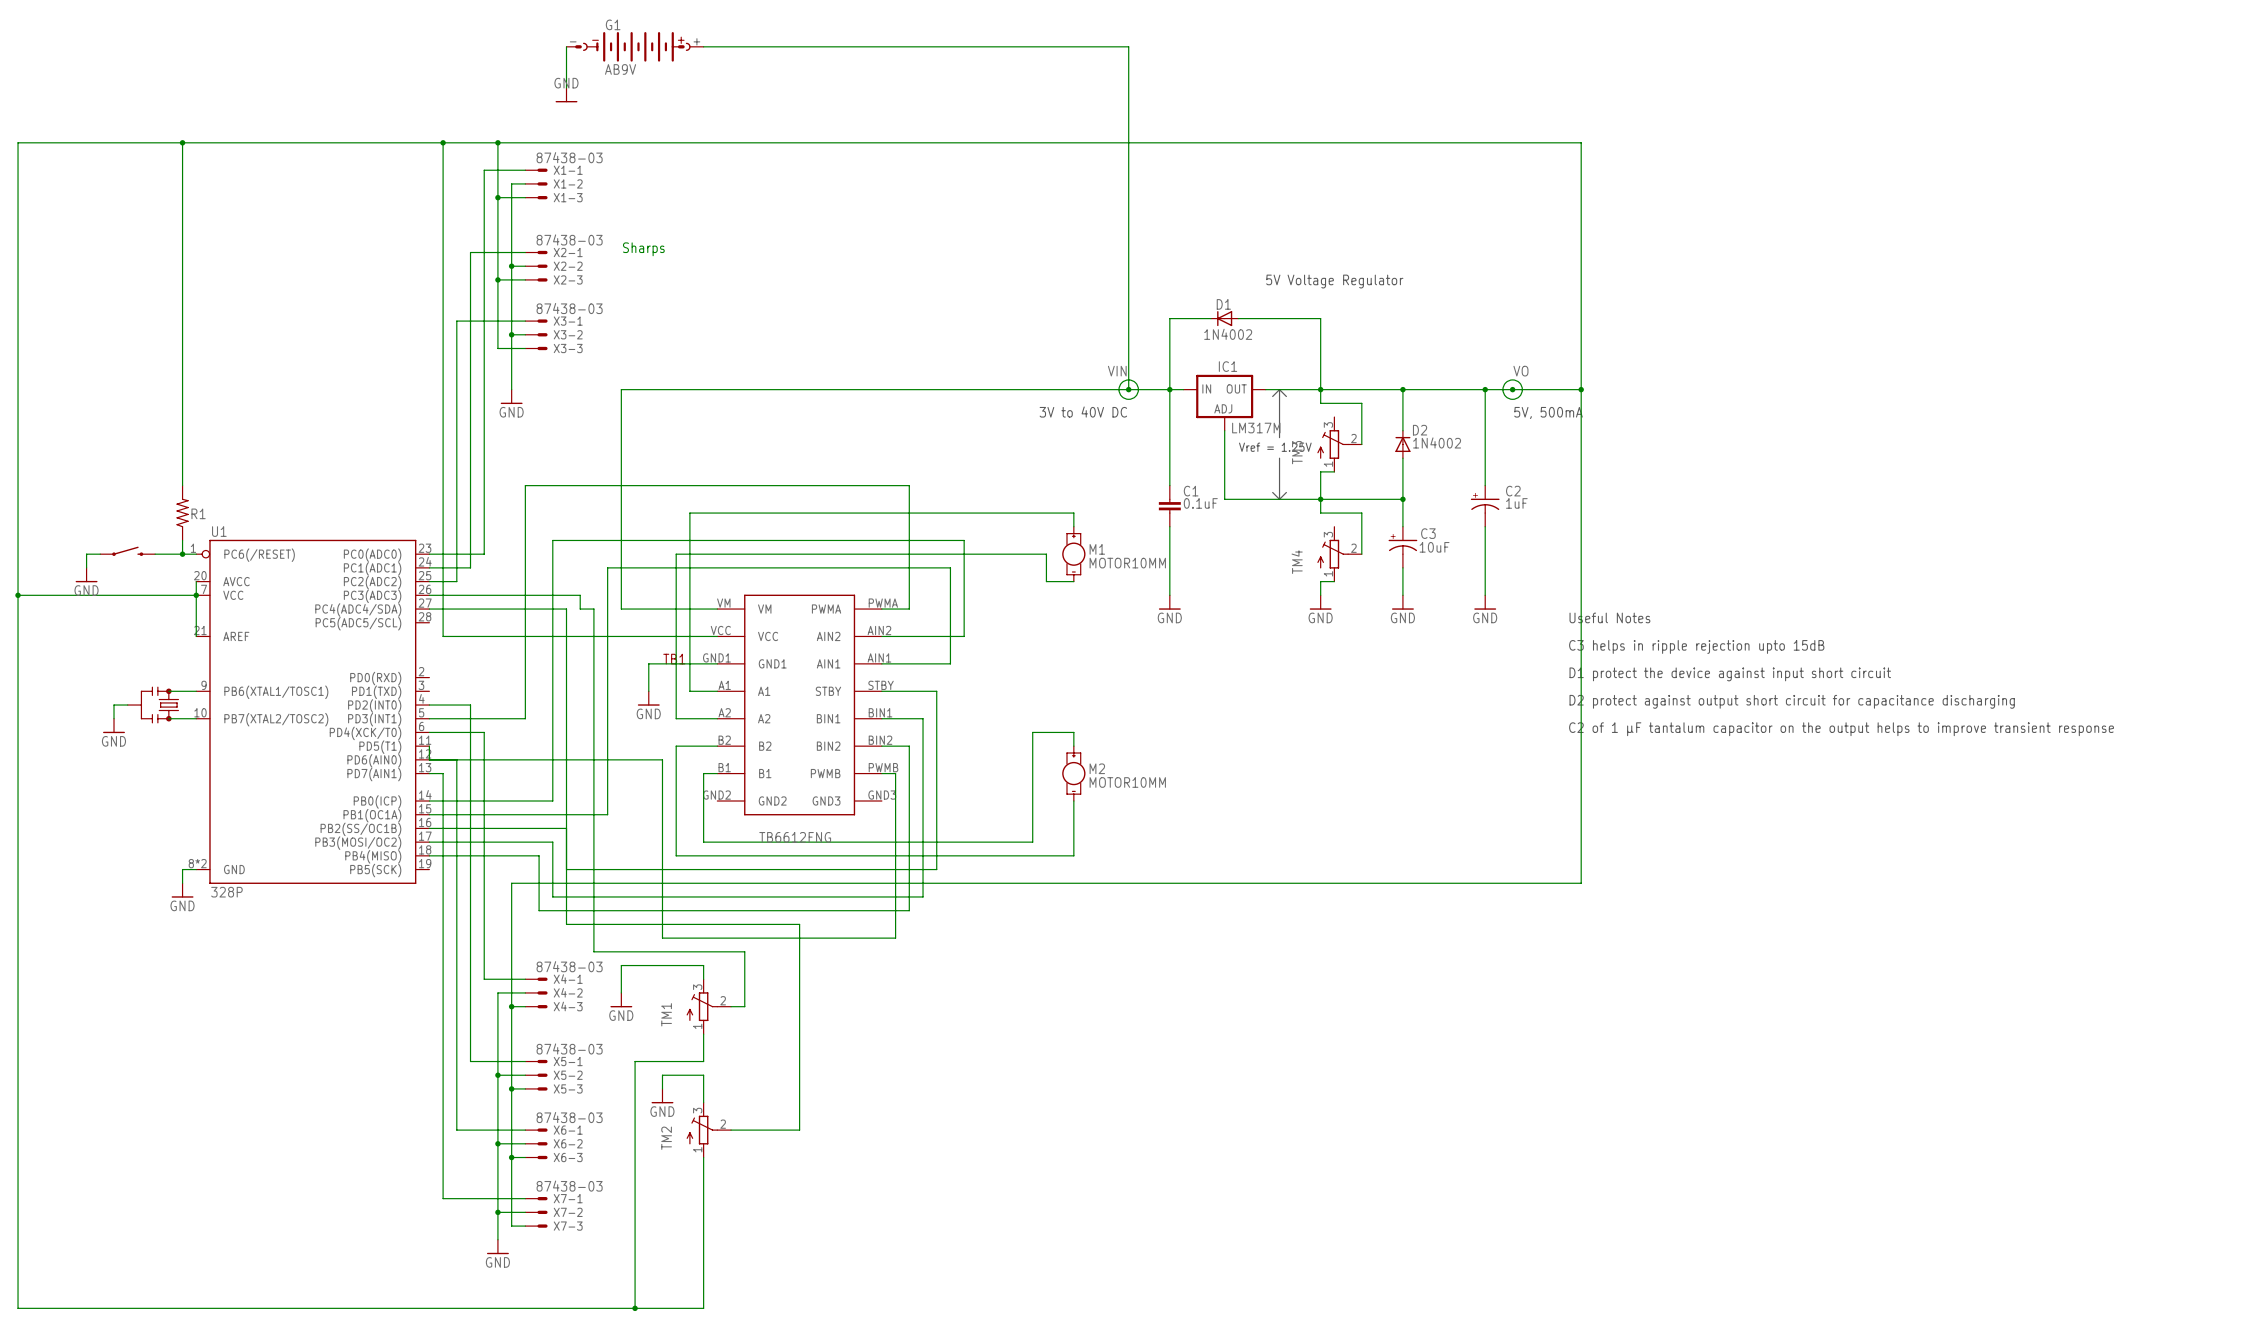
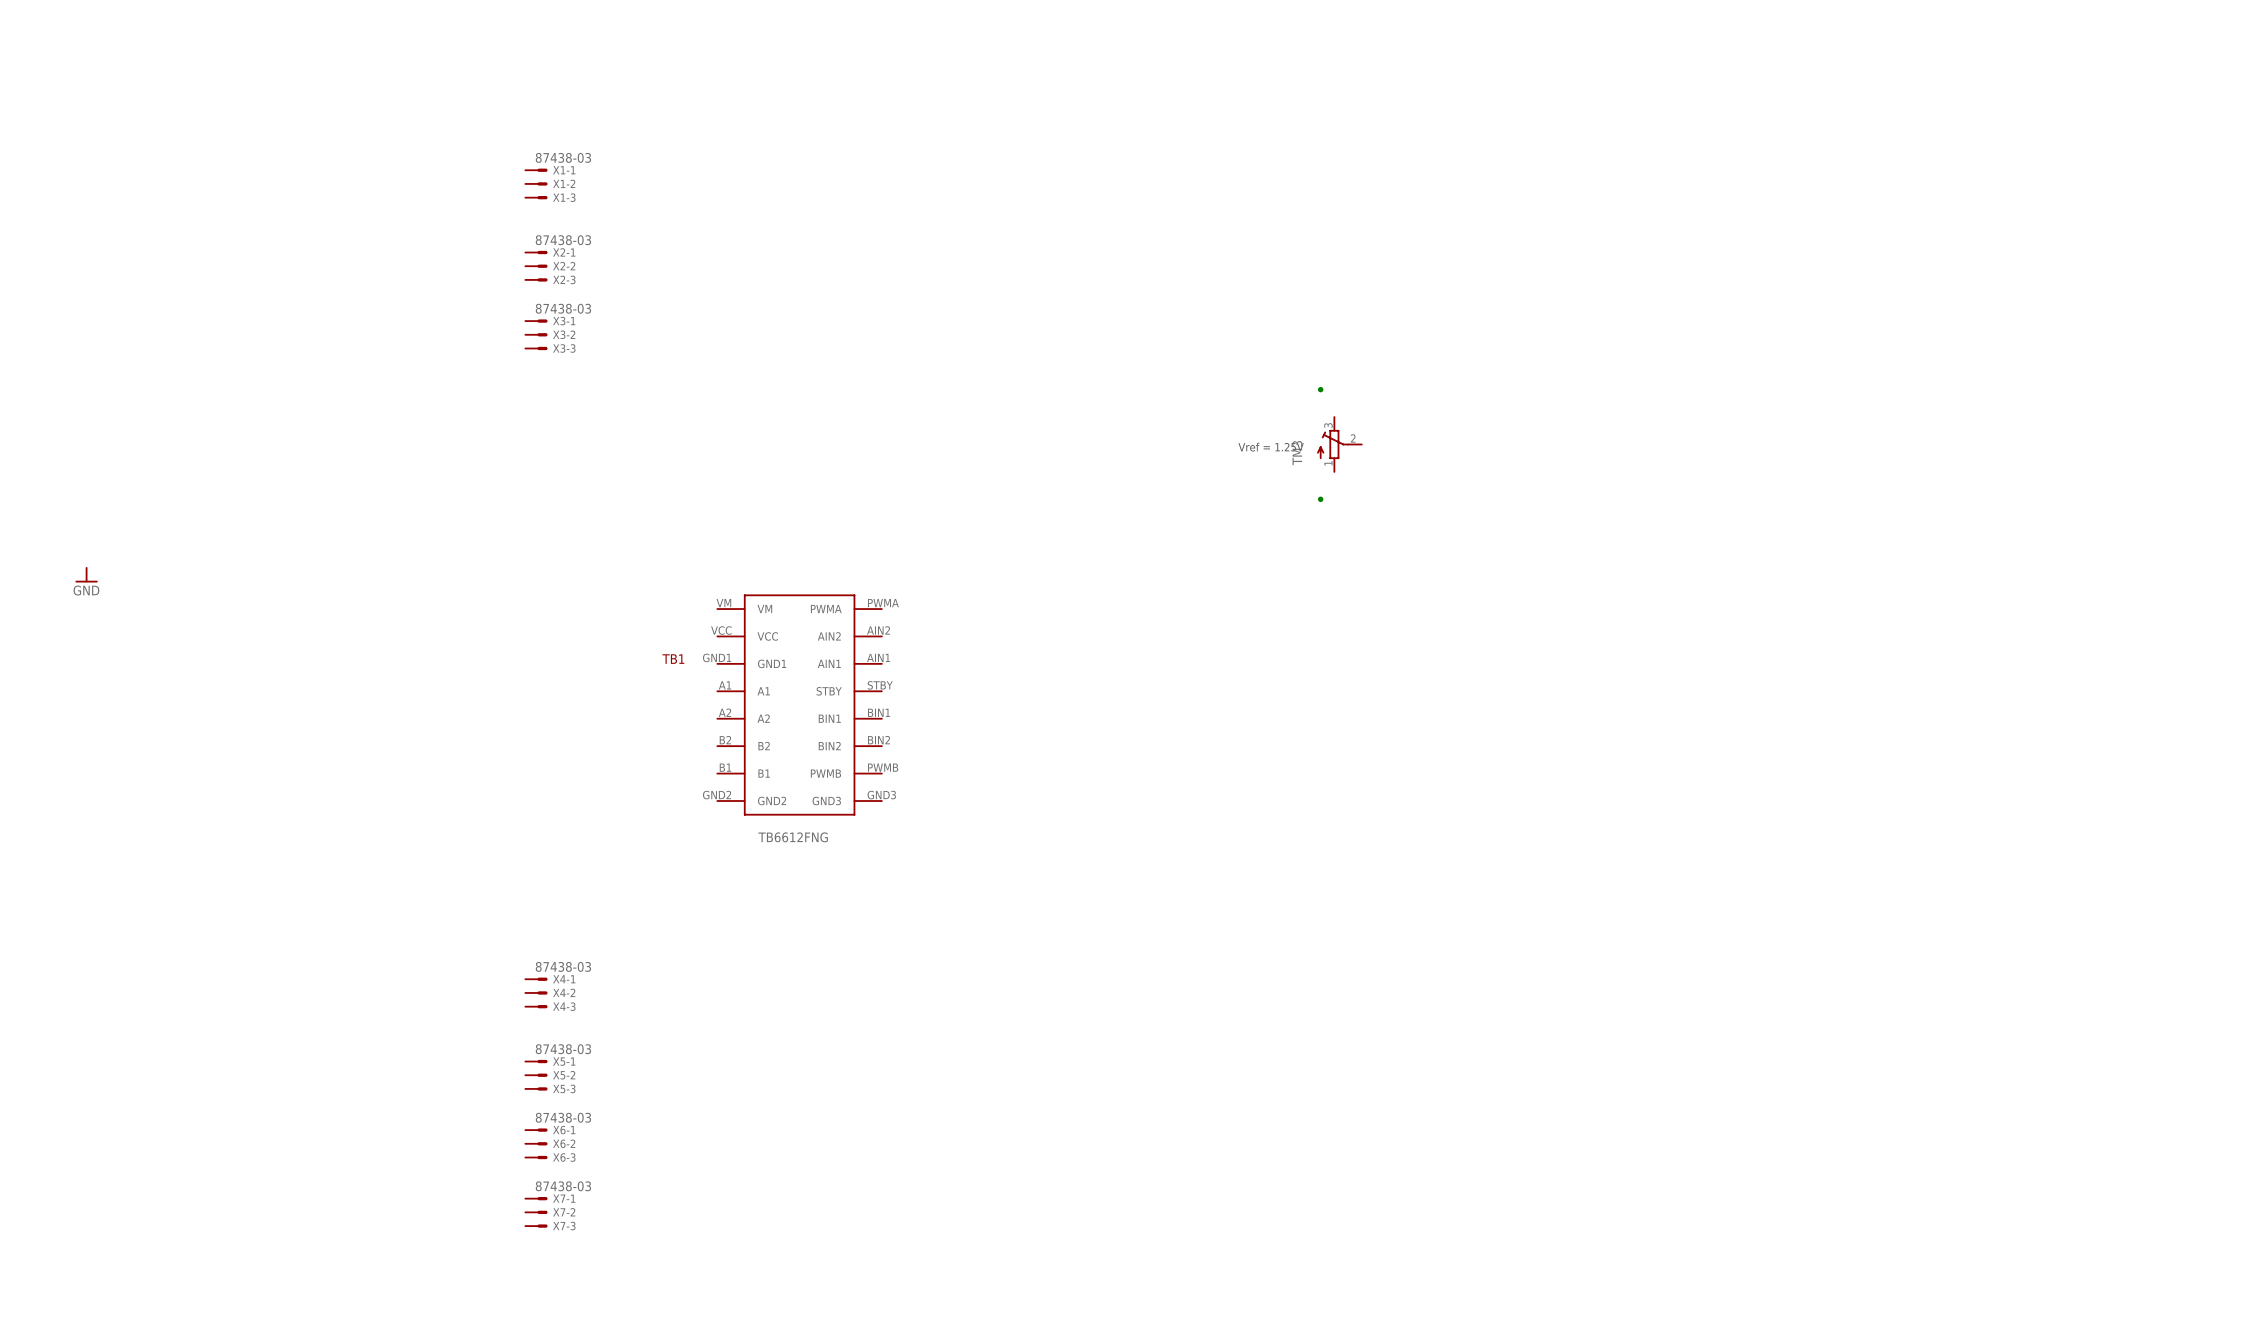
wire: (566, 46) (566, 87) -> none
G1: AB9V (635, 46) -> none
wire: (703, 46) (1128, 46) (1128, 389) -> none
power symbol: GND (566, 95) -> none
wire: (182, 142) (182, 485) -> none
junction: (182, 142) -> none
wire: (443, 142) (443, 636) (717, 636) -> none
junction: (443, 142) -> none
wire: (497, 142) (497, 348) (525, 348) -> none
junction: (497, 142) -> none
wire: (525, 170) (484, 170) (484, 554) (429, 554) -> none
wire: (525, 183) (511, 183) (511, 389) -> none
wire: (497, 197) (525, 197) -> none
junction: (497, 197) -> none
text: Sharps (643, 249) -> none
wire: (525, 252) (470, 252) (470, 567) (429, 567) -> none
wire: (511, 266) (525, 266) -> none
junction: (511, 266) -> none
wire: (497, 279) (525, 279) -> none
junction: (497, 279) -> none
text: 5V Voltage Regulator (1334, 281) -> none
wire: (1210, 318) (1169, 318) (1169, 485) -> none
D1: 1N4002 (1224, 318) -> none
wire: (1238, 318) (1320, 318) (1320, 403) (1361, 403) (1361, 444) -> none
wire: (525, 321) (456, 321) (456, 581) (429, 581) -> none
wire: (511, 334) (525, 334) -> none
junction: (511, 334) -> none
label: VIN (1117, 371) -> none
label: VO (1520, 371) -> none
drawing: [1118, 379, 1139, 400] -> none
drawing: [1502, 379, 1523, 400] -> none
junction: (1128, 389) -> none
junction: (1169, 389) -> none
wire: (1183, 389) (621, 389) (621, 609) (717, 609) -> none
wire: (1265, 389) (1581, 389) -> none
line: (1279, 389) (1279, 437) -> none
line: (1279, 389) (1286, 396) -> none
line: (1279, 389) (1272, 396) -> none
wire: (1402, 389) (1402, 430) -> none
junction: (1402, 389) -> none
wire: (1485, 389) (1485, 485) -> none
junction: (1485, 389) -> none
junction: (1512, 389) -> none
junction: (1581, 389) -> none
power symbol: GND (511, 396) -> none
IC1: (1224, 402) -> none
text: 3V to 40V DC (1083, 412) -> none
text: 5V, 500mA (1548, 412) -> none
wire: (1224, 430) (1224, 499) (1402, 499) -> none
D2: 1N4002 (1402, 444) -> none
line: (1279, 458) (1279, 499) -> none
wire: (1402, 458) (1402, 526) -> none
wire: (1334, 471) (1320, 471) (1320, 513) (1361, 513) (1361, 554) -> none
line: (1272, 492) (1279, 499) -> none
line: (1286, 492) (1279, 499) -> none
junction: (1402, 499) -> none
C1: 0.1uF (1169, 506) -> none
C2: 1uF (1485, 506) -> none
R1: (182, 513) -> none
wire: (1073, 526) (1073, 513) (689, 513) (689, 691) (717, 691) -> none
wire: (1169, 526) (1169, 595) -> none
wire: (1485, 526) (1485, 595) -> none
wire: (182, 540) (182, 554) -> none
C3: 10uF (1402, 547) -> none
part: (127, 551) -> none
wire: (100, 554) (86, 554) (86, 567) -> none
wire: (155, 554) (196, 554) -> none
junction: (182, 554) -> none
M1: MOTOR10MM (1073, 554) -> none
TM4: (1339, 554) -> none
wire: (1402, 567) (1402, 595) -> none
wire: (196, 581) (196, 636) -> none
wire: (1073, 581) (1046, 581) (1046, 554) (676, 554) (676, 718) (717, 718) -> none
wire: (1334, 581) (1320, 581) (1320, 595) -> none
wire: (18, 595) (196, 595) -> none
junction: (18, 595) -> none
junction: (196, 595) -> none
wire: (429, 595) (580, 595) (580, 609) (593, 609) (593, 951) (744, 951) (744, 1006) (731, 1006) -> none
power symbol: GND (1169, 602) -> none
power symbol: GND (1320, 602) -> none
power symbol: GND (1402, 602) -> none
power symbol: GND (1485, 602) -> none
wire: (429, 609) (566, 609) (566, 924) (799, 924) (799, 1130) (731, 1130) -> none
wire: (881, 609) (909, 609) (909, 485) (525, 485) (525, 718) (429, 718) -> none
text: Useful Notes (1609, 617) -> none
wire: (881, 636) (964, 636) (964, 540) (552, 540) (552, 801) (429, 801) -> none
text: C3 helps in ripple rejection upto 15dB (1696, 646) -> none
wire: (717, 663) (648, 663) (648, 691) -> none
wire: (881, 663) (950, 663) (950, 567) (607, 567) (607, 814) (429, 814) -> none
text: D1 protect the device against input short circuit (1730, 674) -> none
wire: (168, 691) (196, 691) -> none
wire: (881, 691) (936, 691) (936, 869) (566, 869) -> none
power symbol: GND (648, 698) -> none
text: D2 protect against output short circuit for capacitance discharging (1792, 701) -> none
wire: (127, 705) (114, 705) (114, 718) -> none
part: (153, 705) -> none
wire: (429, 705) (470, 705) (470, 1061) (525, 1061) -> none
U1: 328P (312, 711) -> none
wire: (168, 718) (196, 718) -> none
wire: (881, 718) (923, 718) (923, 896) (552, 896) (552, 842) (429, 842) -> none
power symbol: GND (114, 725) -> none
text: C2 of 1 µF tantalum capacitor on the output helps to improve transient response (1841, 729) -> none
wire: (429, 732) (484, 732) (484, 979) (525, 979) -> none
wire: (429, 746) (429, 759) (662, 759) (662, 938) (895, 938) (895, 773) (881, 773) -> none
wire: (717, 746) (676, 746) (676, 855) (1073, 855) (1073, 801) -> none
wire: (881, 746) (909, 746) (909, 910) (539, 910) (539, 855) (429, 855) -> none
wire: (1073, 746) (1073, 732) (1032, 732) (1032, 842) (703, 842) (703, 773) (717, 773) -> none
wire: (456, 759) (456, 1130) (525, 1130) -> none
wire: (429, 773) (443, 773) (443, 1198) (525, 1198) -> none
M2: MOTOR10MM (1073, 773) -> none
wire: (429, 828) (566, 828) -> none
wire: (196, 869) (182, 869) (182, 883) -> none
power symbol: GND (182, 890) -> none
wire: (703, 979) (703, 965) (621, 965) (621, 992) -> none
wire: (525, 992) (497, 992) (497, 1239) -> none
power symbol: GND (621, 1000) -> none
wire: (511, 1006) (525, 1006) -> none
junction: (511, 1006) -> none
TM1: (708, 1006) -> none
wire: (703, 1034) (703, 1061) (635, 1061) (635, 1308) -> none
wire: (497, 1075) (525, 1075) -> none
junction: (497, 1075) -> none
wire: (511, 1088) (525, 1088) -> none
junction: (511, 1088) -> none
wire: (662, 1088) (662, 1075) (703, 1075) (703, 1102) -> none
power symbol: GND (662, 1096) -> none
TM2: (708, 1130) -> none
wire: (497, 1143) (525, 1143) -> none
junction: (497, 1143) -> none
wire: (511, 1157) (525, 1157) -> none
junction: (511, 1157) -> none
wire: (703, 1157) (703, 1308) (18, 1308) (18, 142) (1581, 142) (1581, 883) (511, 883) (511, 1226) (525, 1226) -> none
wire: (497, 1212) (525, 1212) -> none
junction: (497, 1212) -> none
power symbol: GND (497, 1246) -> none
junction: (635, 1308) -> none

